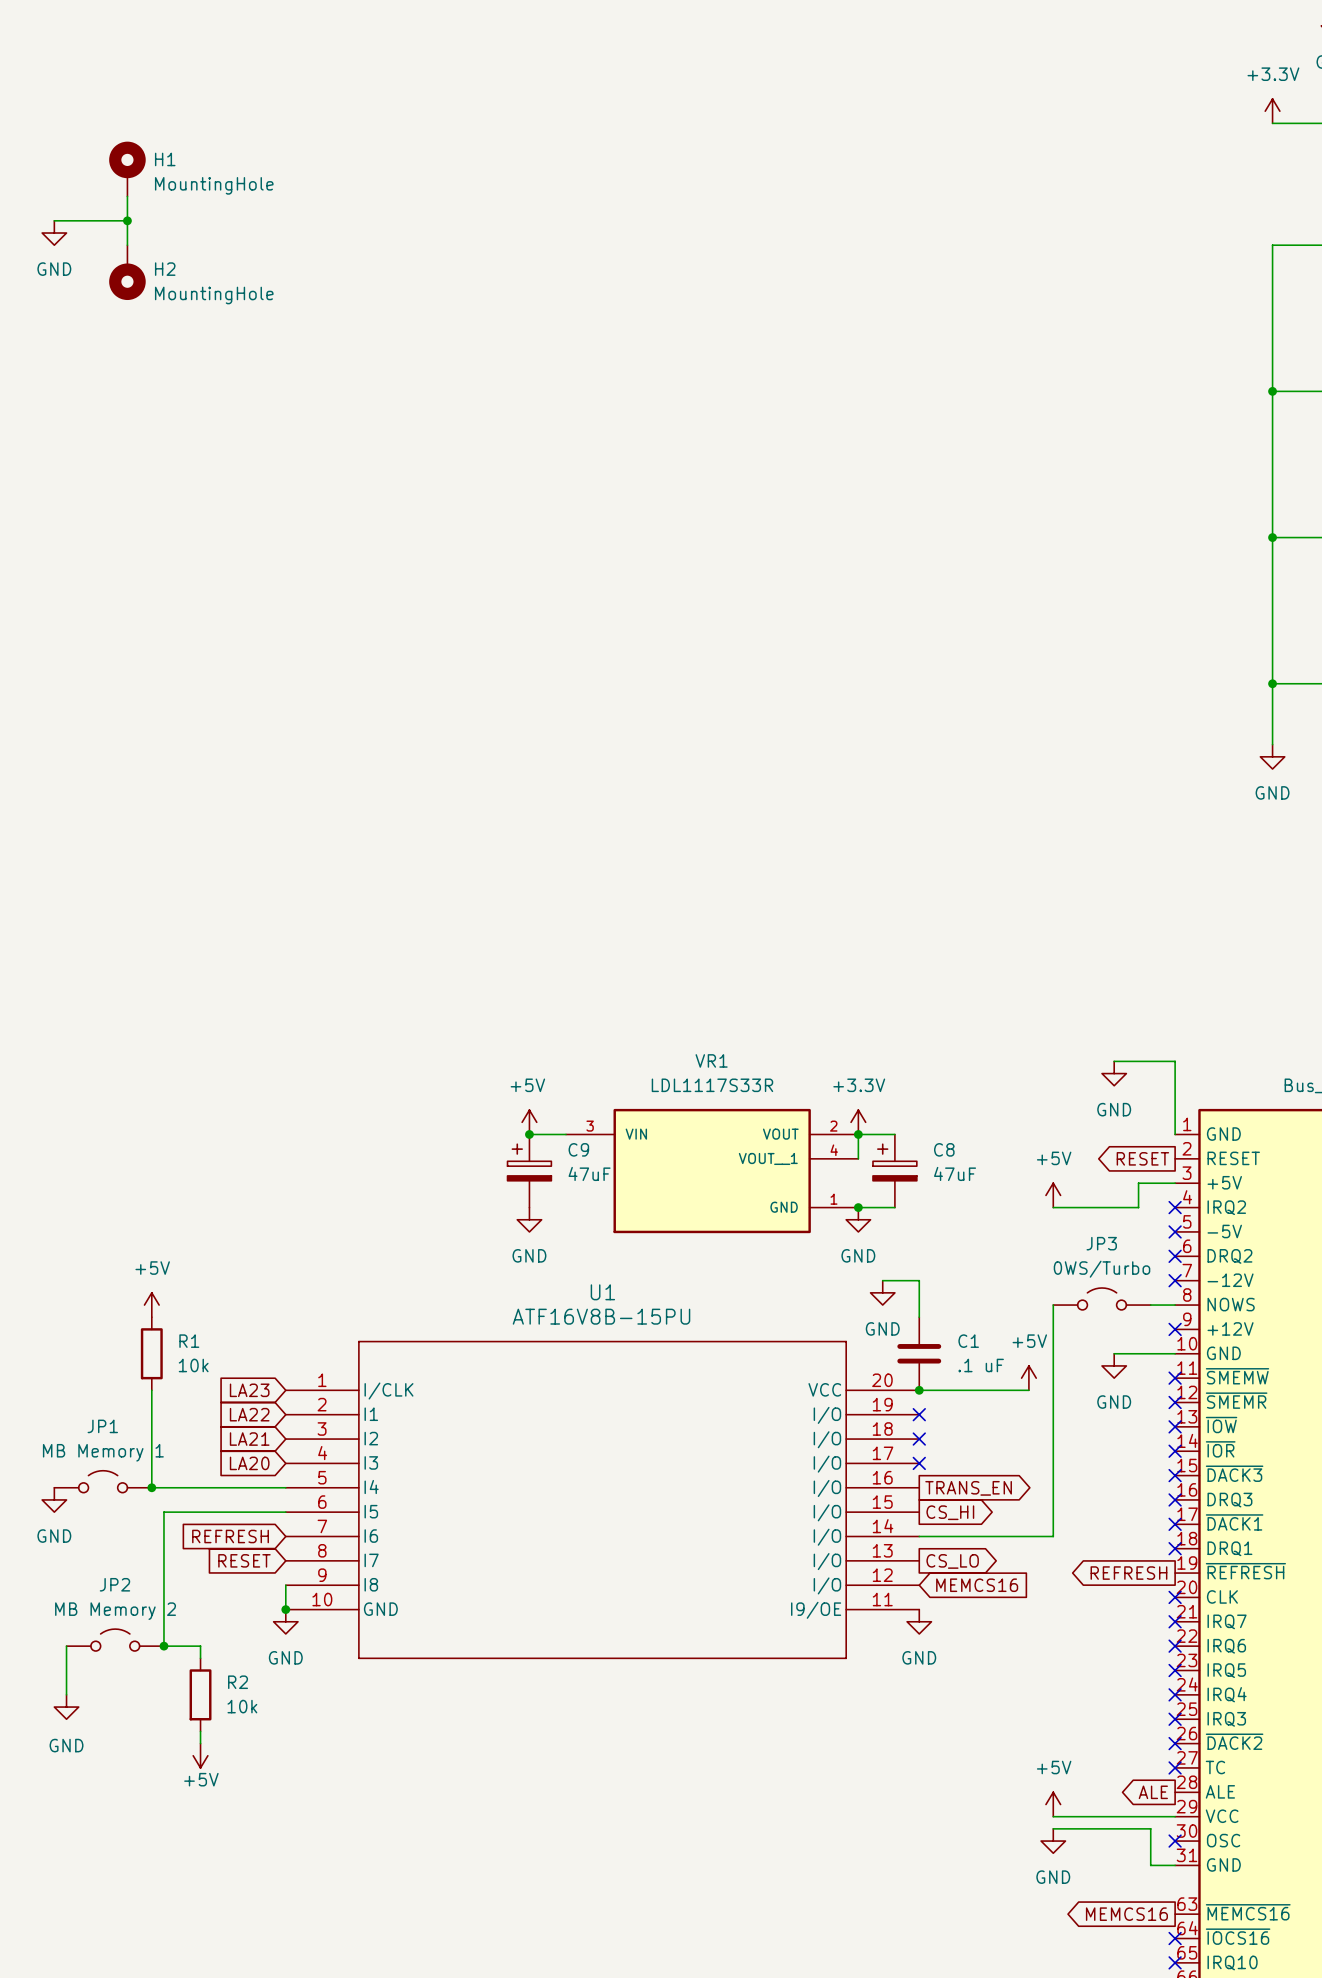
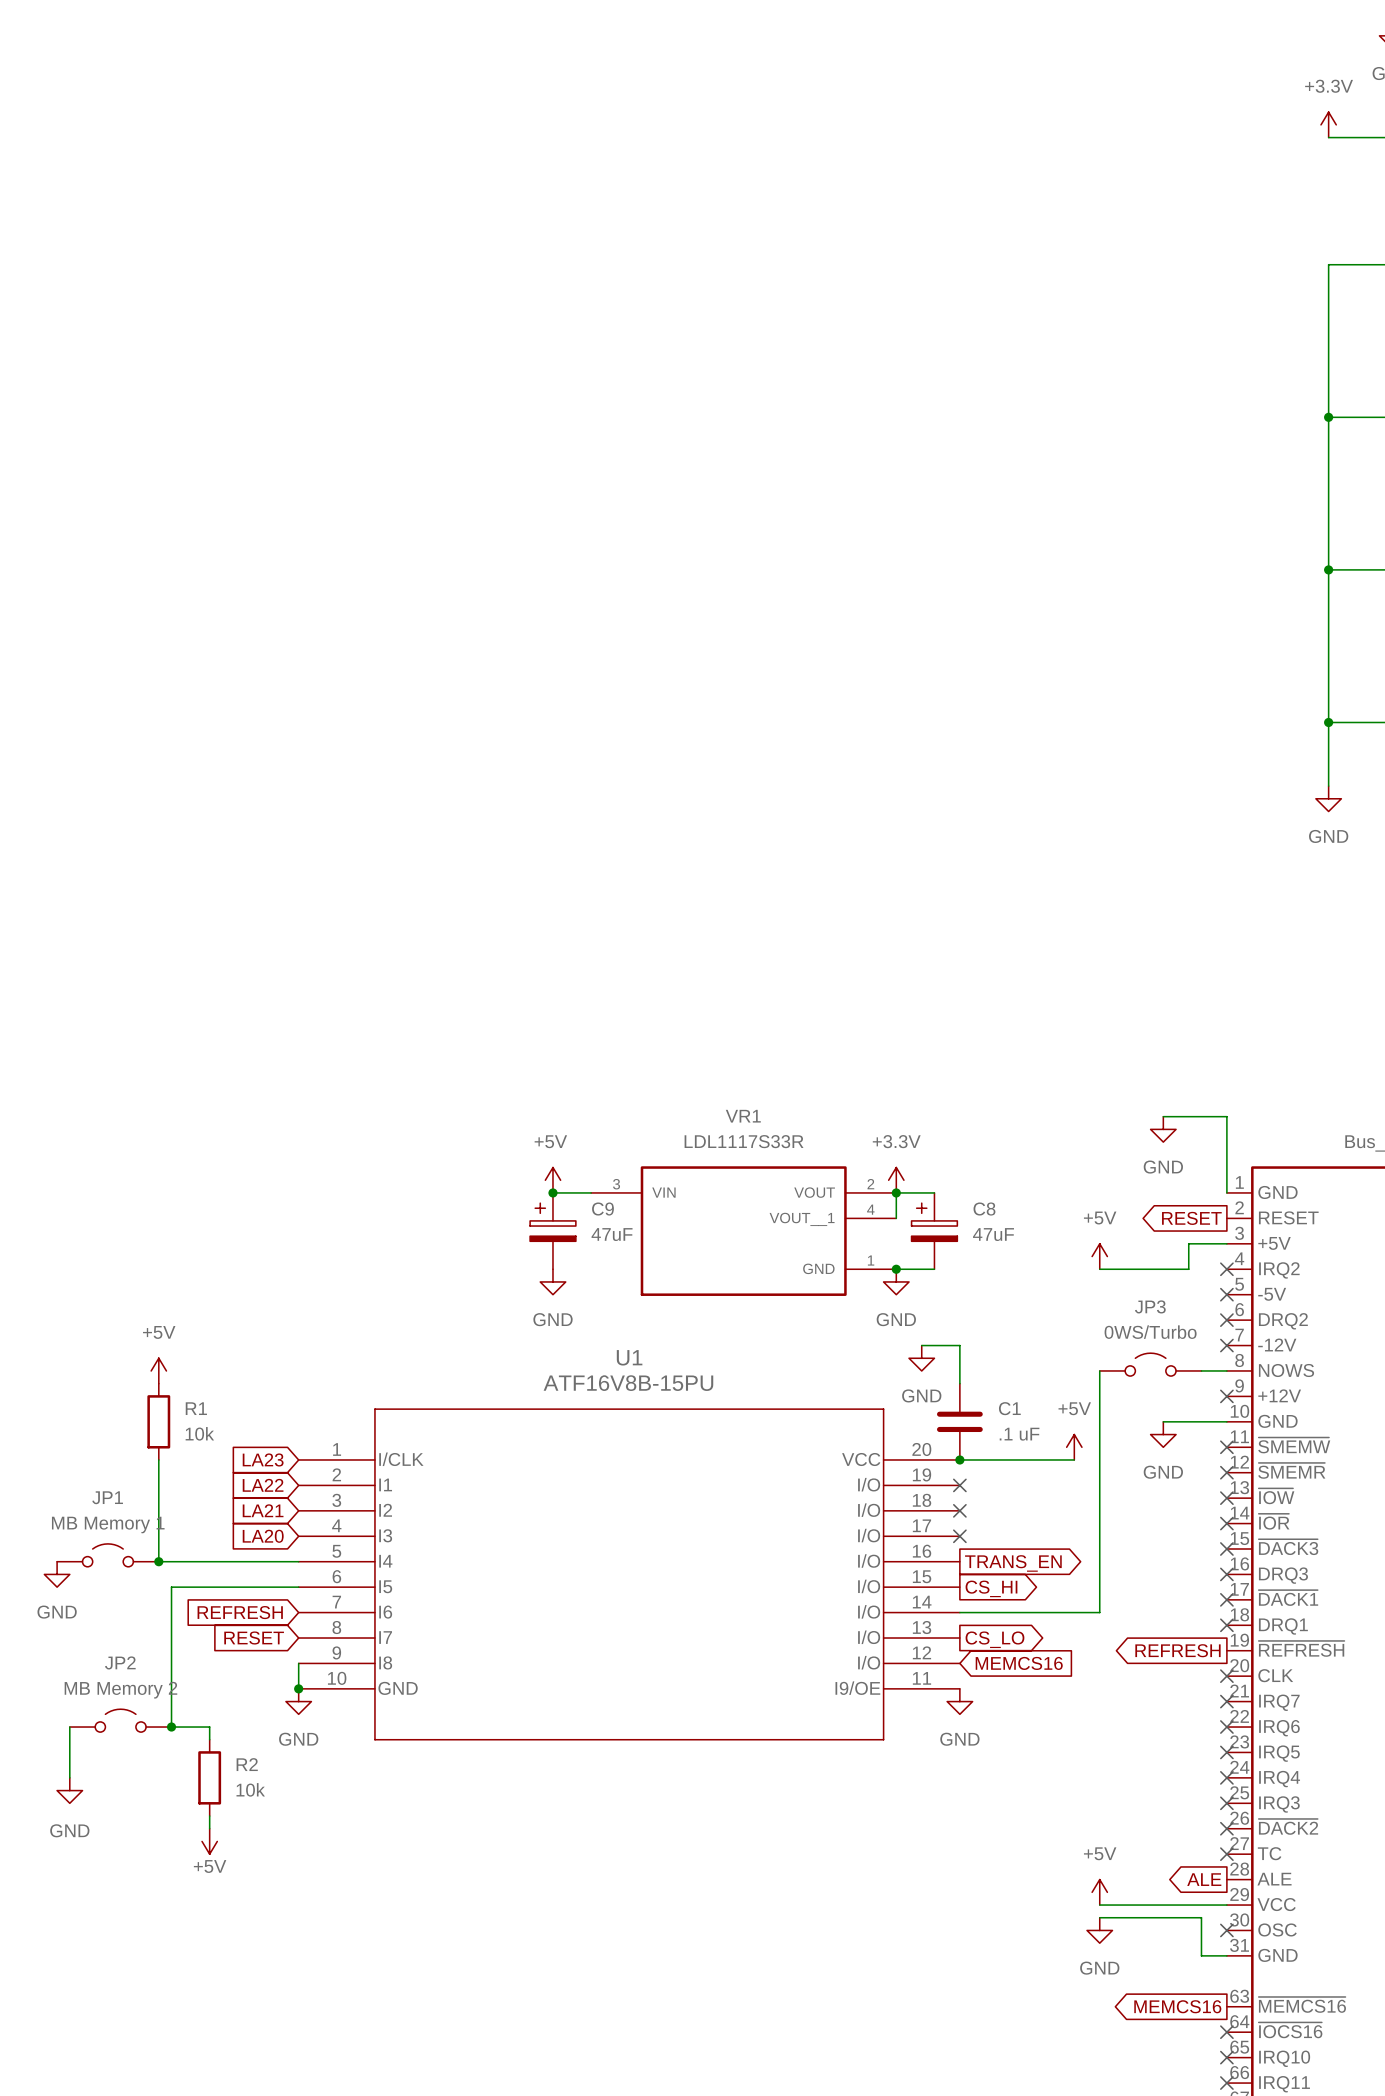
H1: MountingHole (127, 169) -> none
wire: (127, 196) (127, 245) -> none
wire: (54, 220) (127, 220) -> none
junction: (127, 220) -> none
power symbol: GND (54, 233) -> none
H2: MountingHole (127, 272) -> none

